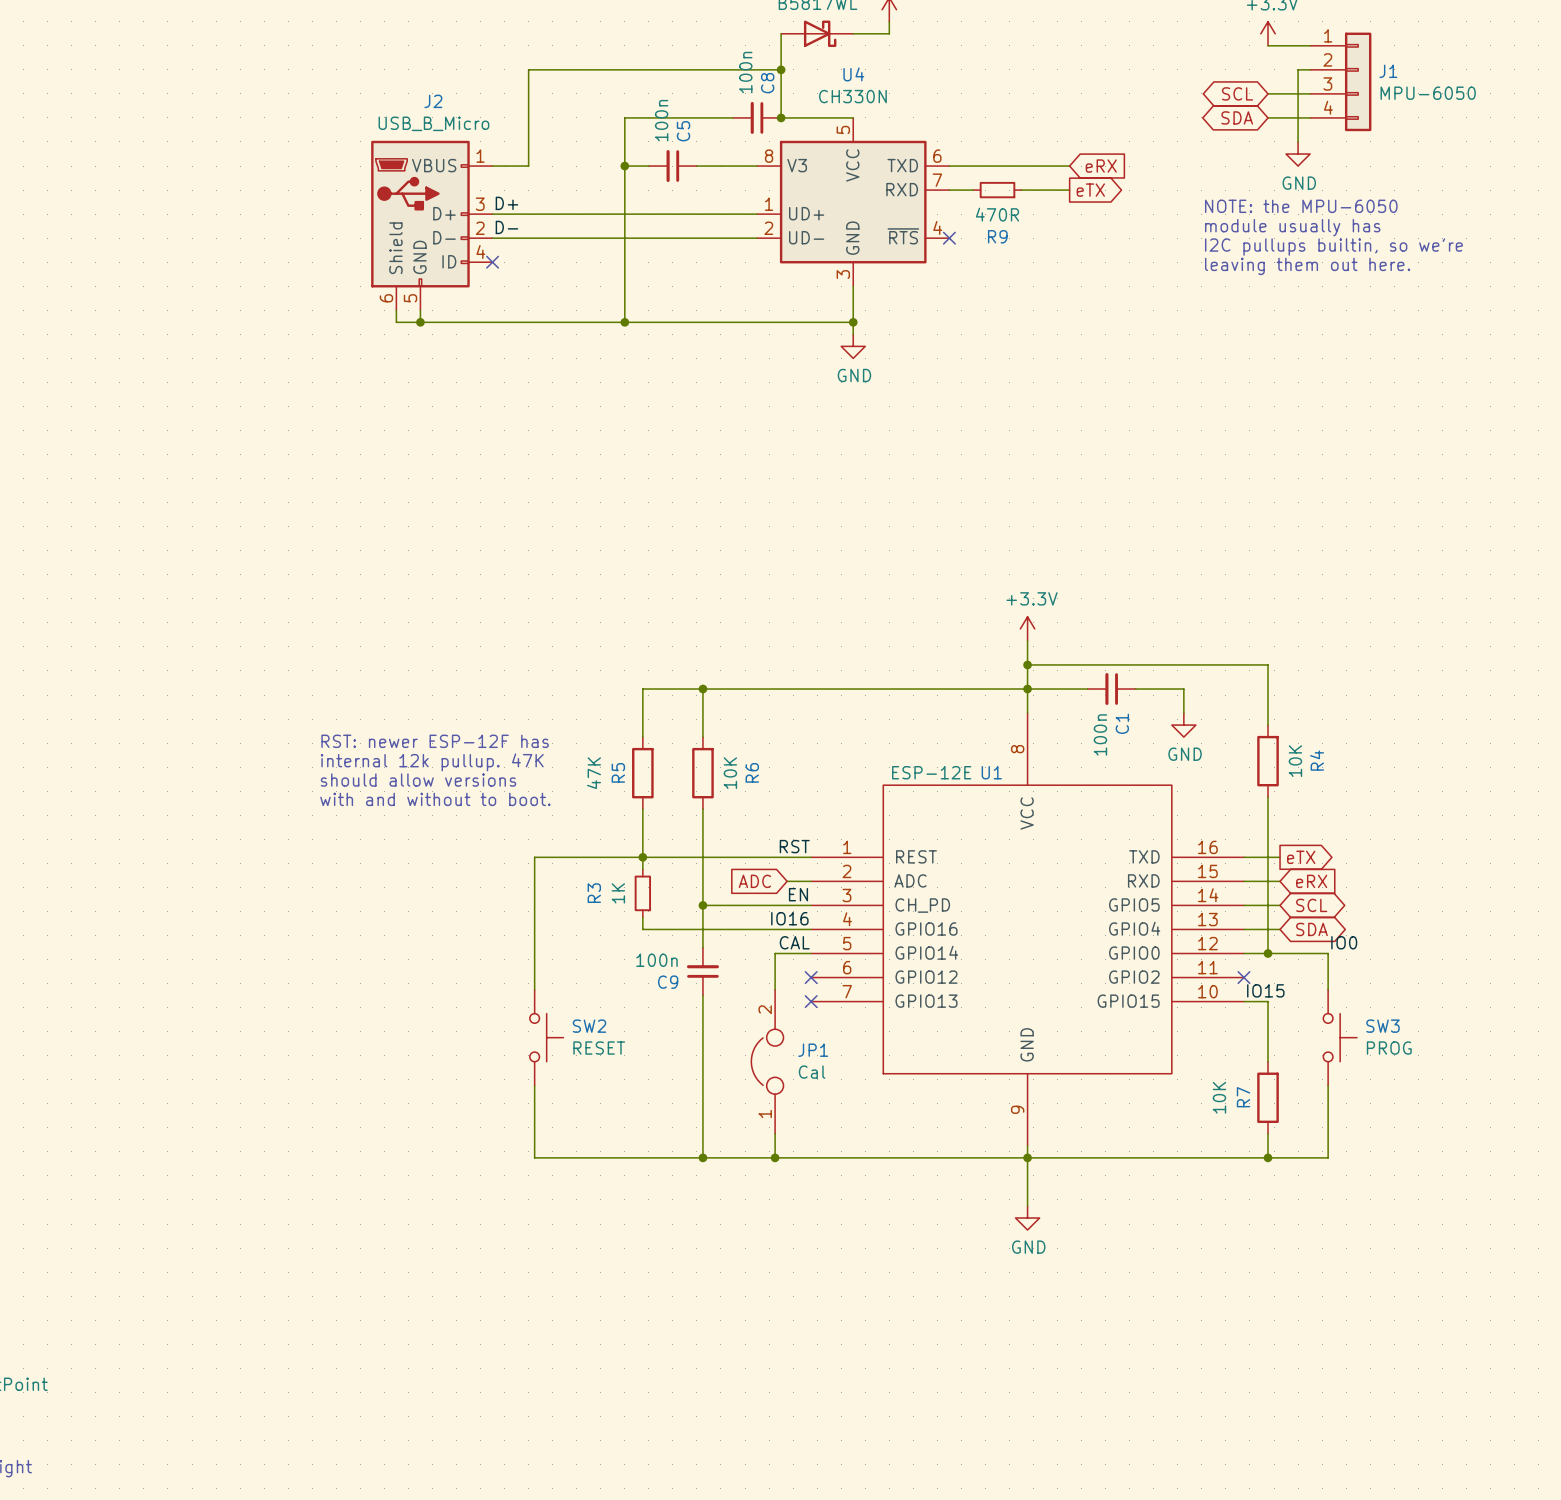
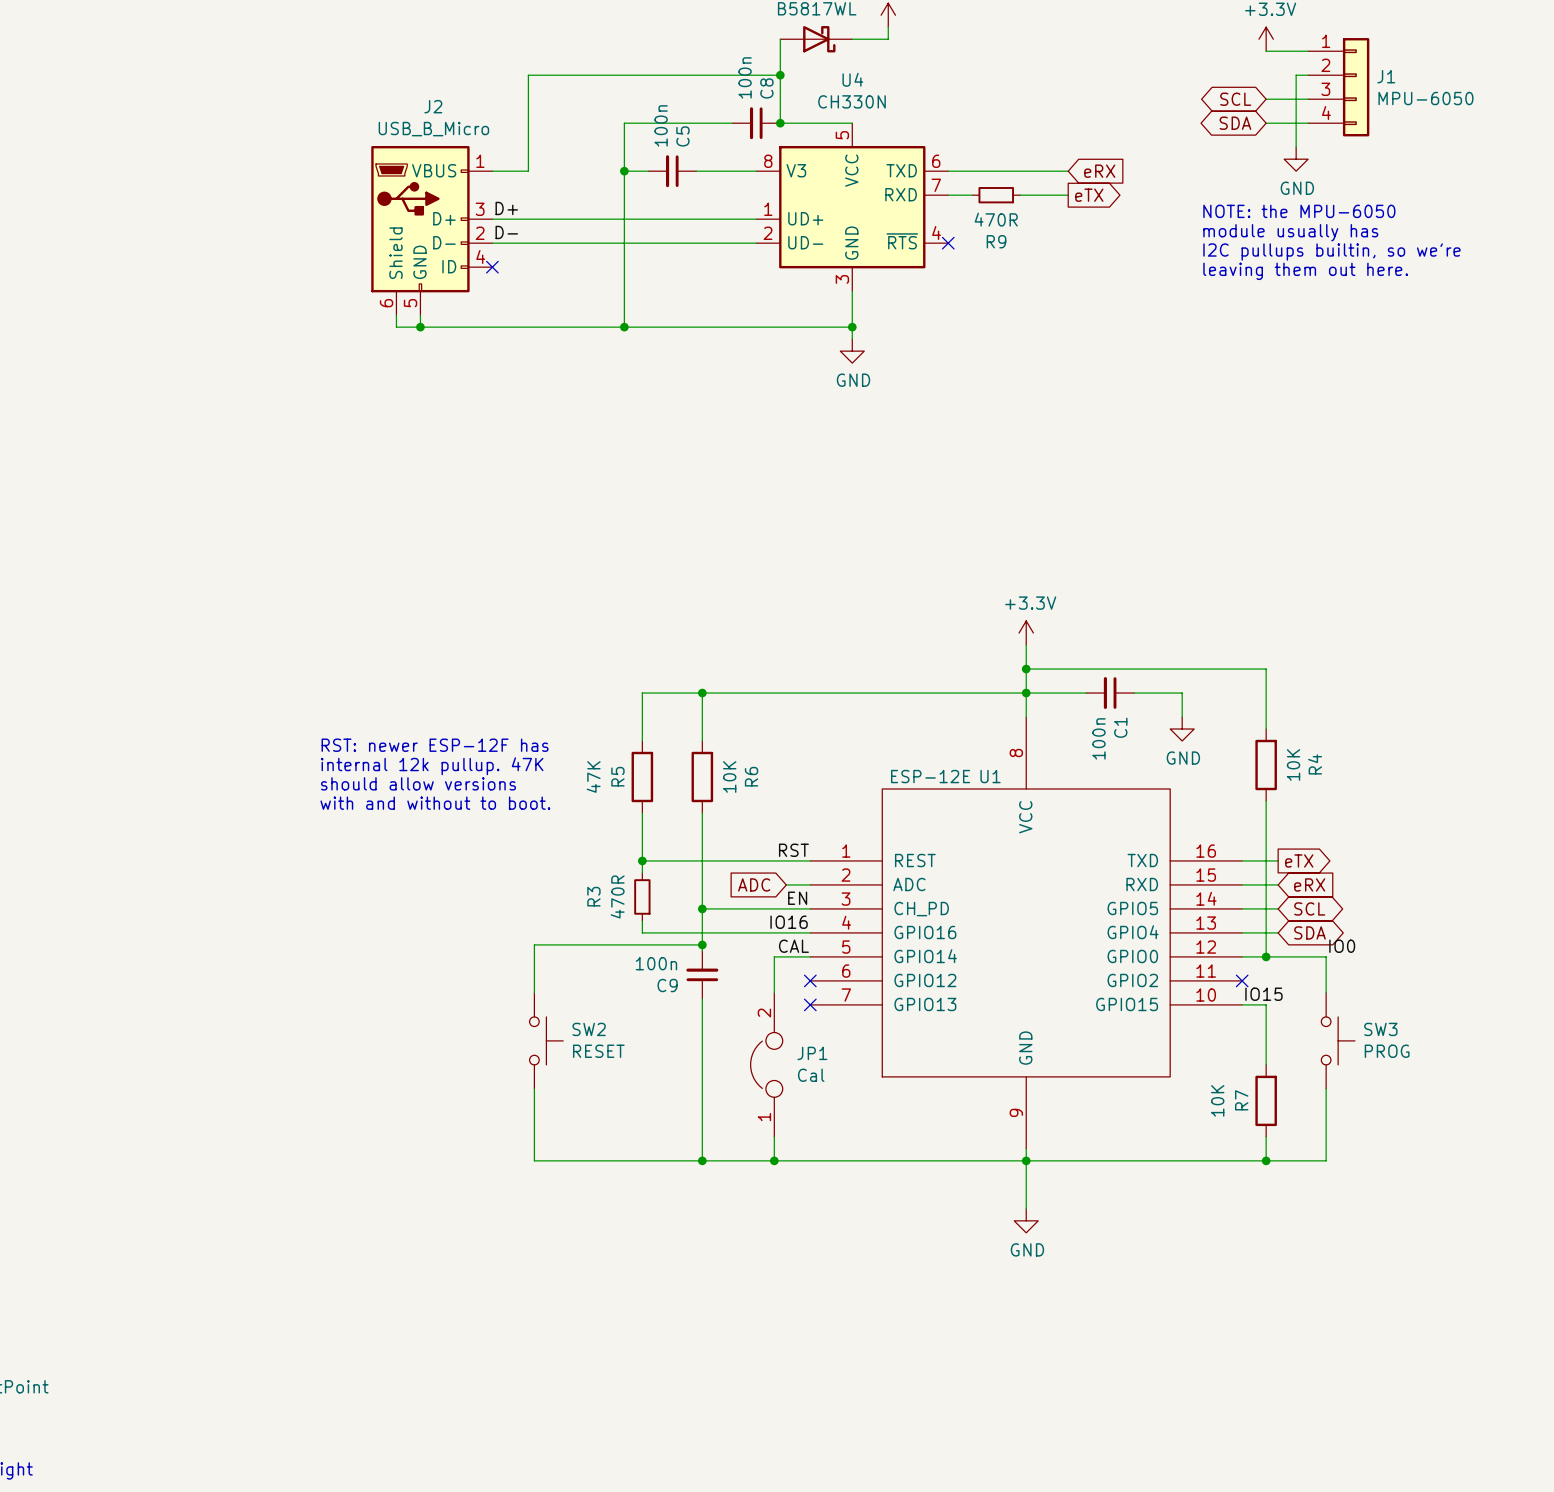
wire: (642, 857) (534, 857) (534, 941) -> (702, 944) (534, 944)
R3 value: 1K (618, 893) -> 470R (617, 896)
junction: none -> (702, 944)

